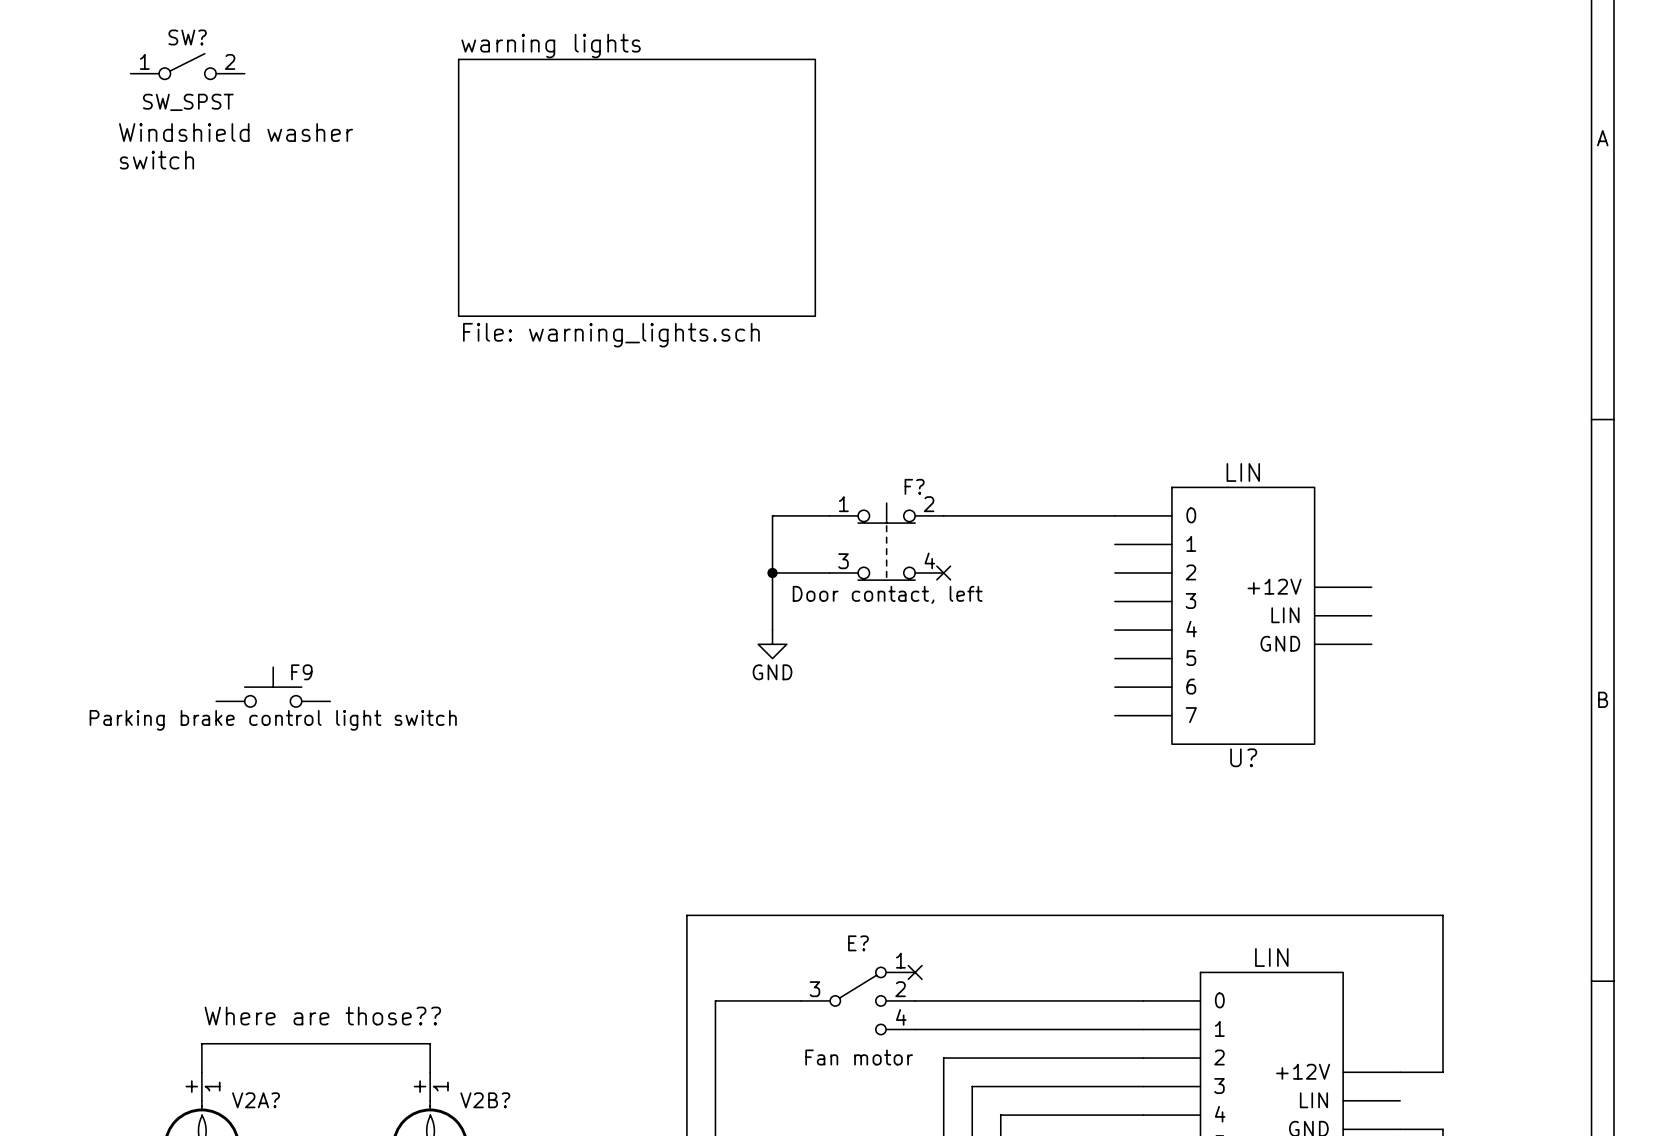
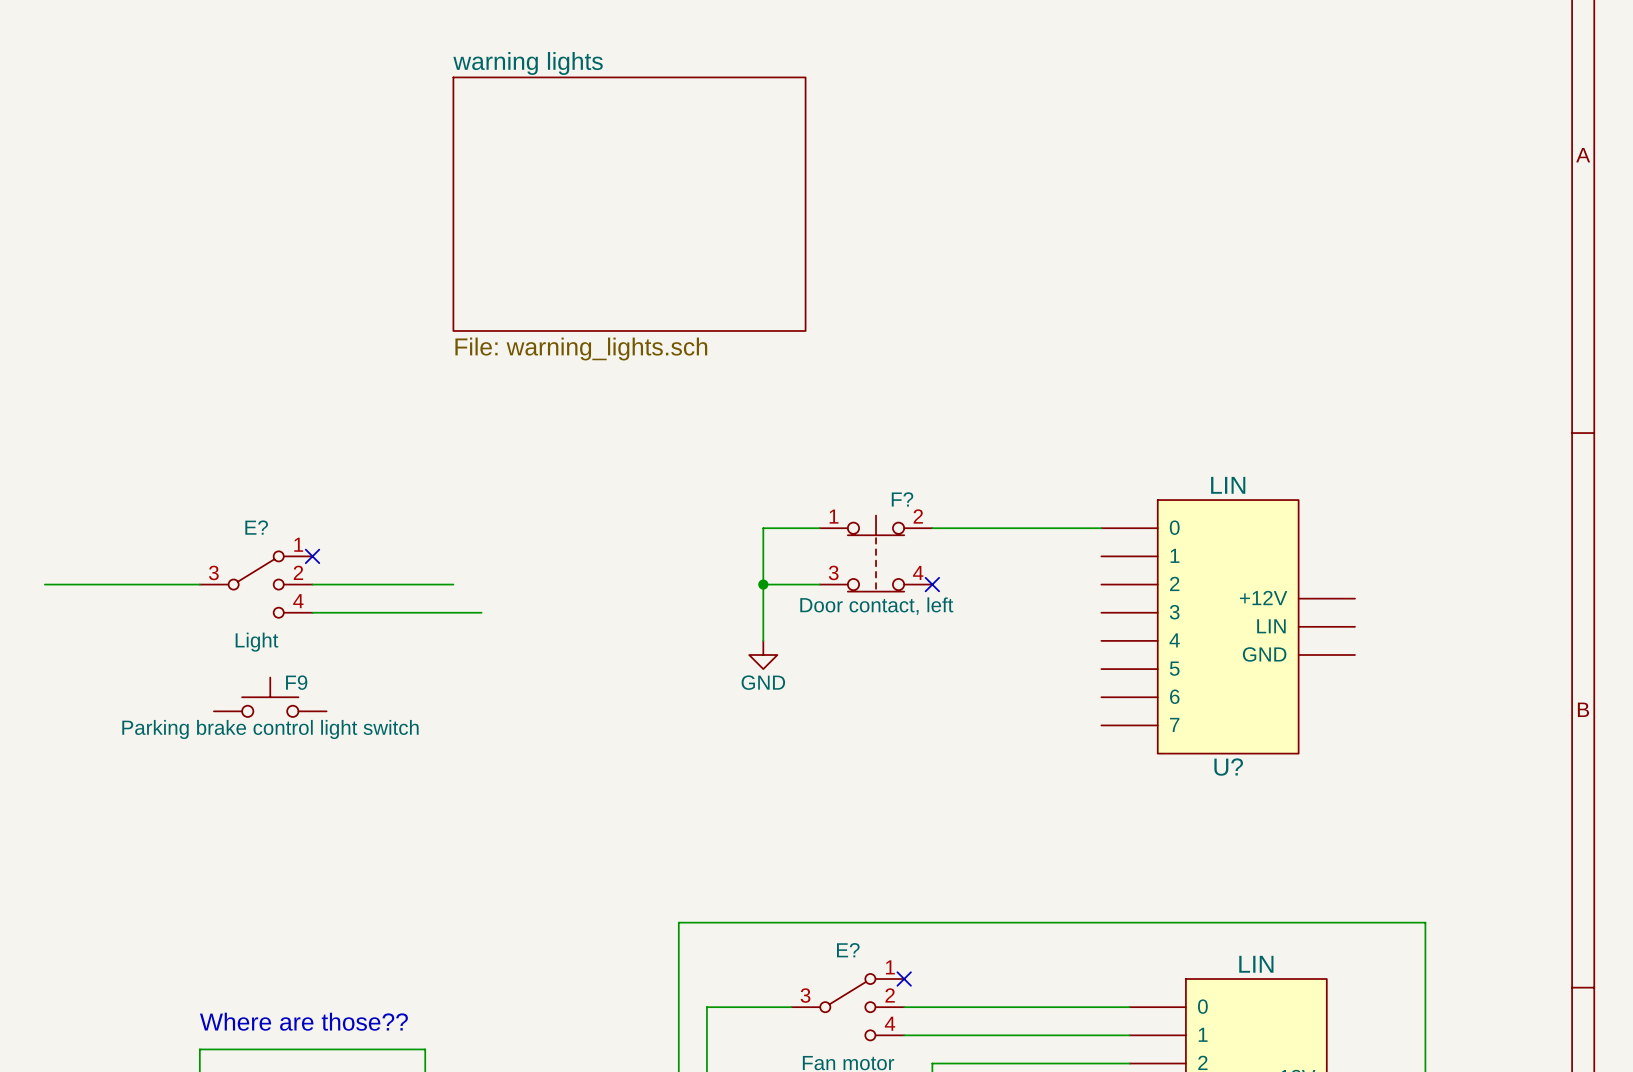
SW?: SW_SPST (187, 66) -> none
text: Windshield washer (236, 132) -> none
text: switch (156, 160) -> none
no-connect mark: none -> (312, 556)
wire: none -> (44, 584) (199, 584)
E?: none -> Light (256, 584)
wire: none -> (312, 584) (453, 584)
wire: none -> (312, 612) (481, 612)

